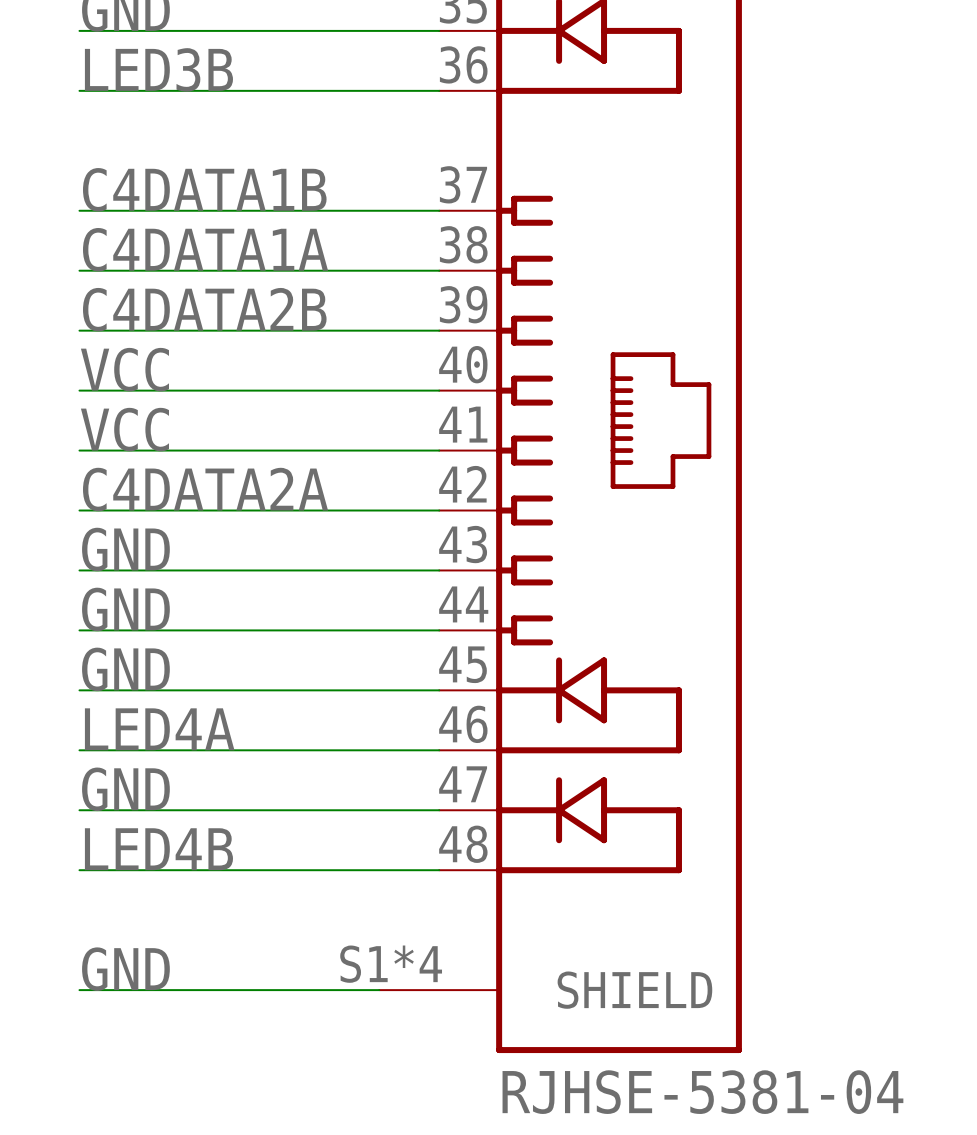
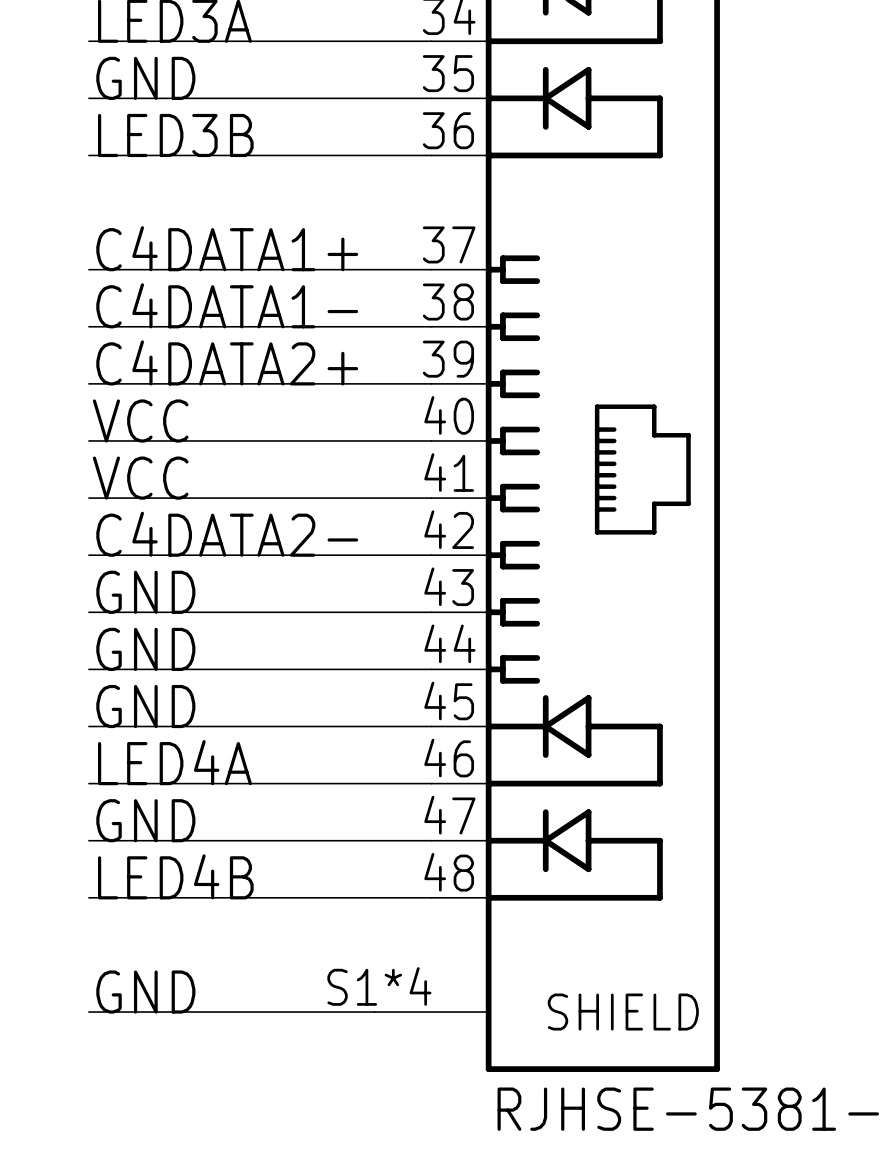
label: C4DATA1B (204, 189) -> C4DATA1+ (227, 248)
label: C4DATA1A (205, 249) -> C4DATA1- (227, 305)
label: C4DATA2B (204, 309) -> C4DATA2+ (227, 362)
label: C4DATA2A (205, 489) -> C4DATA2- (227, 534)

